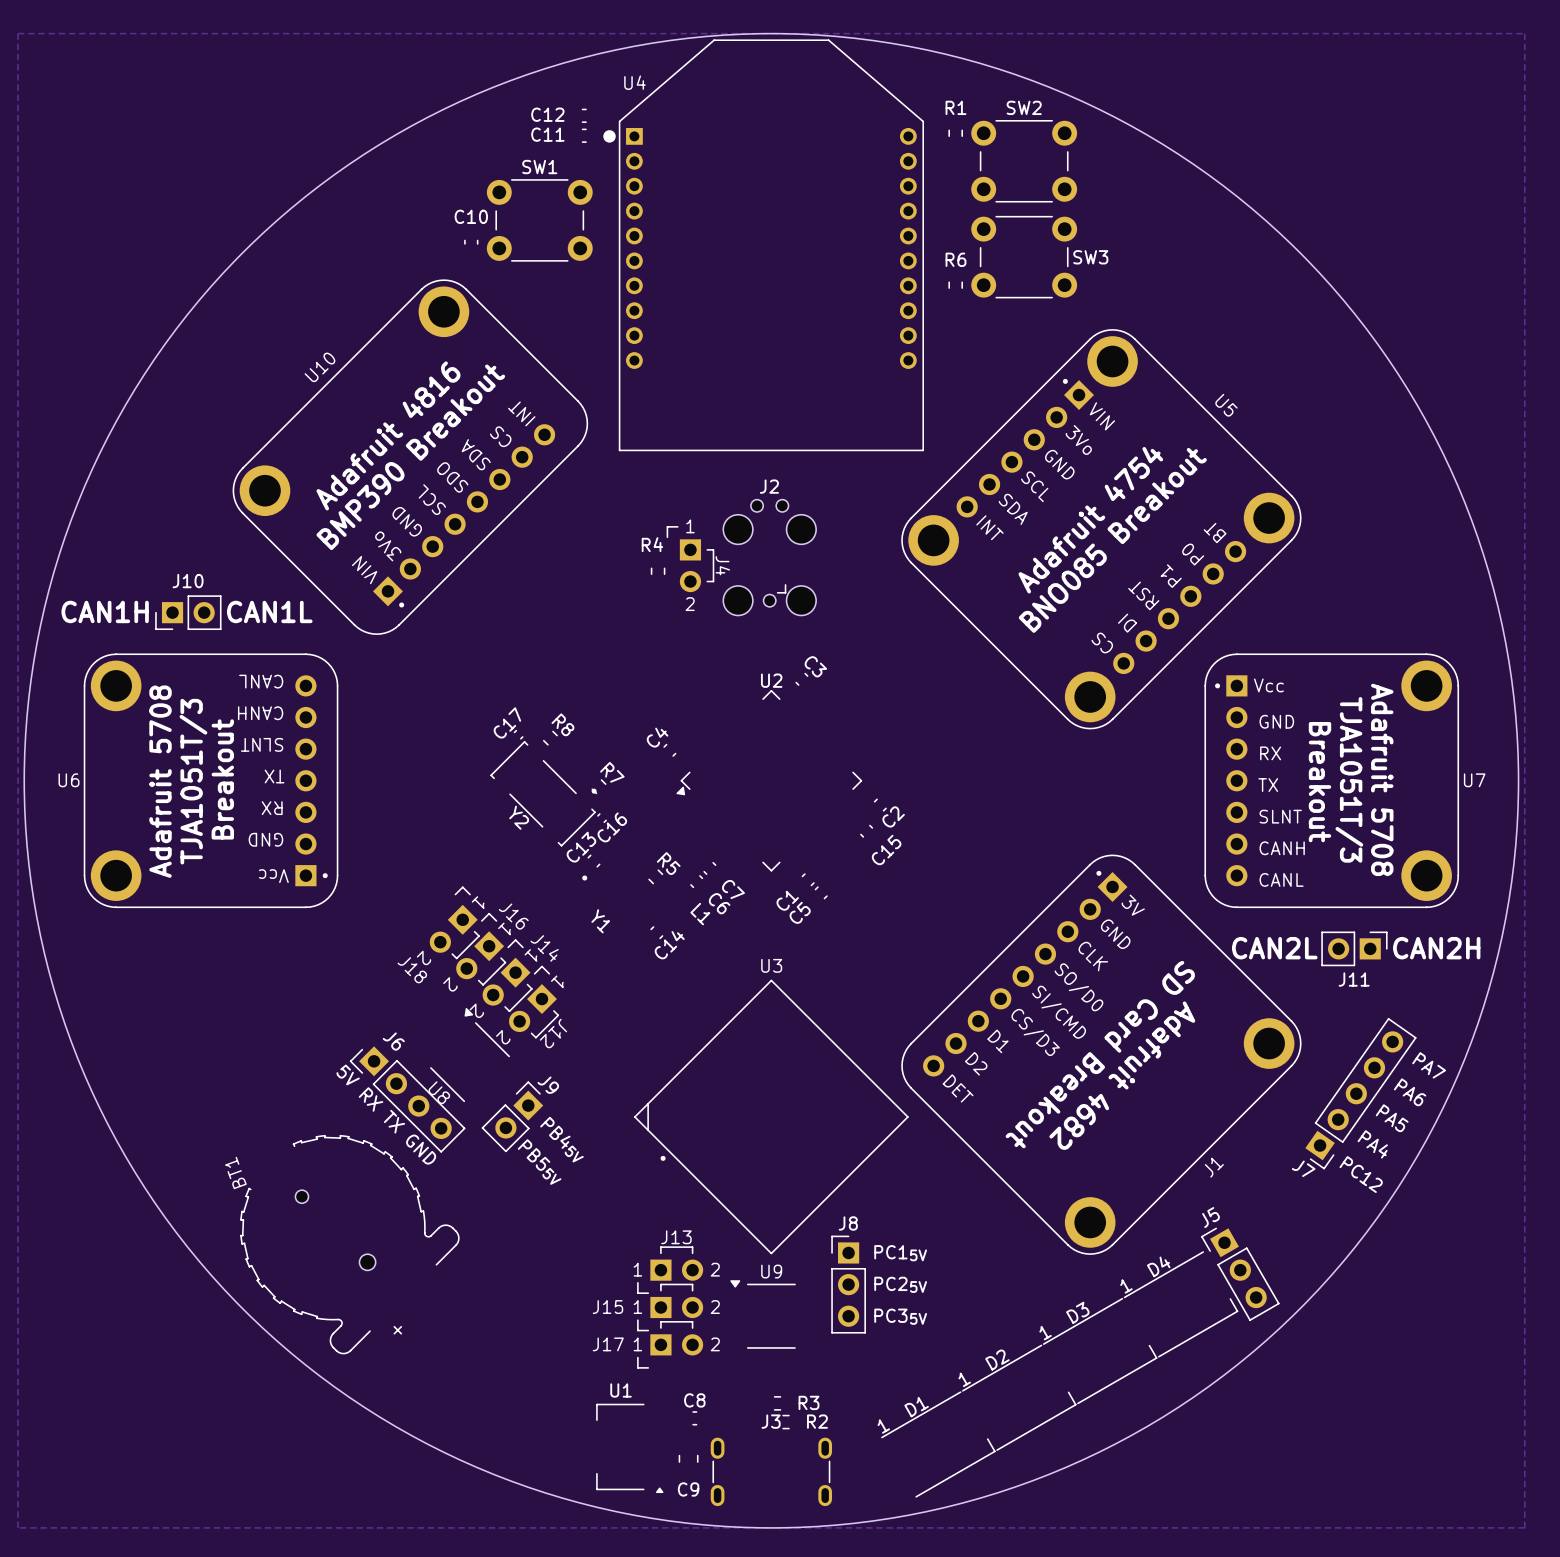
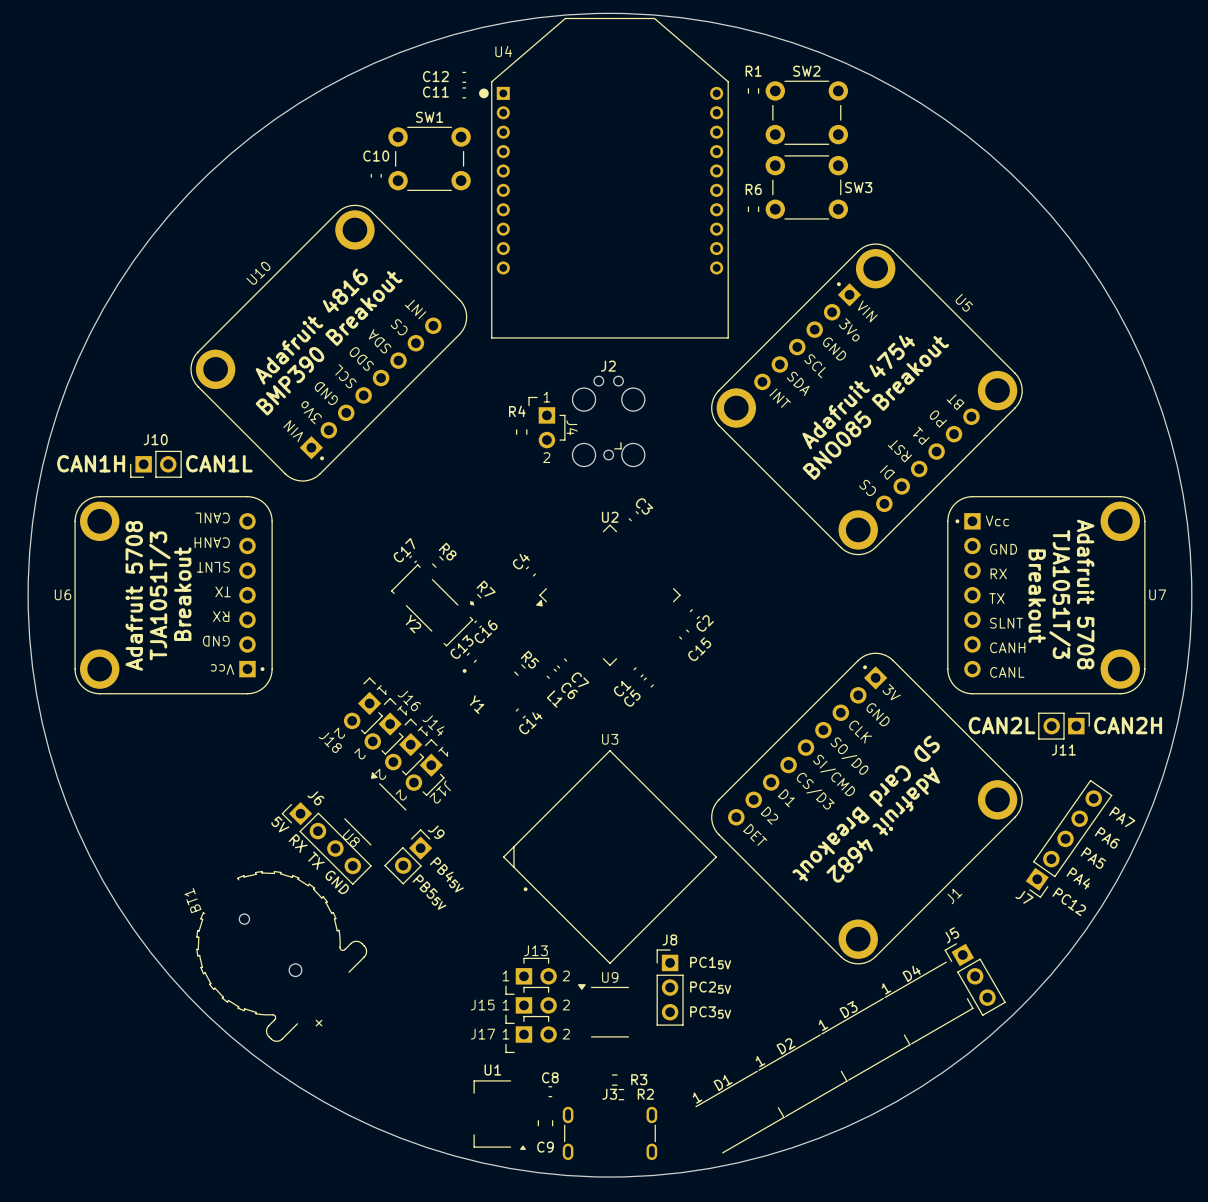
zone outline: (18, 33) (1524, 33) (1524, 1527) (18, 1527) (18, 33) -> none

